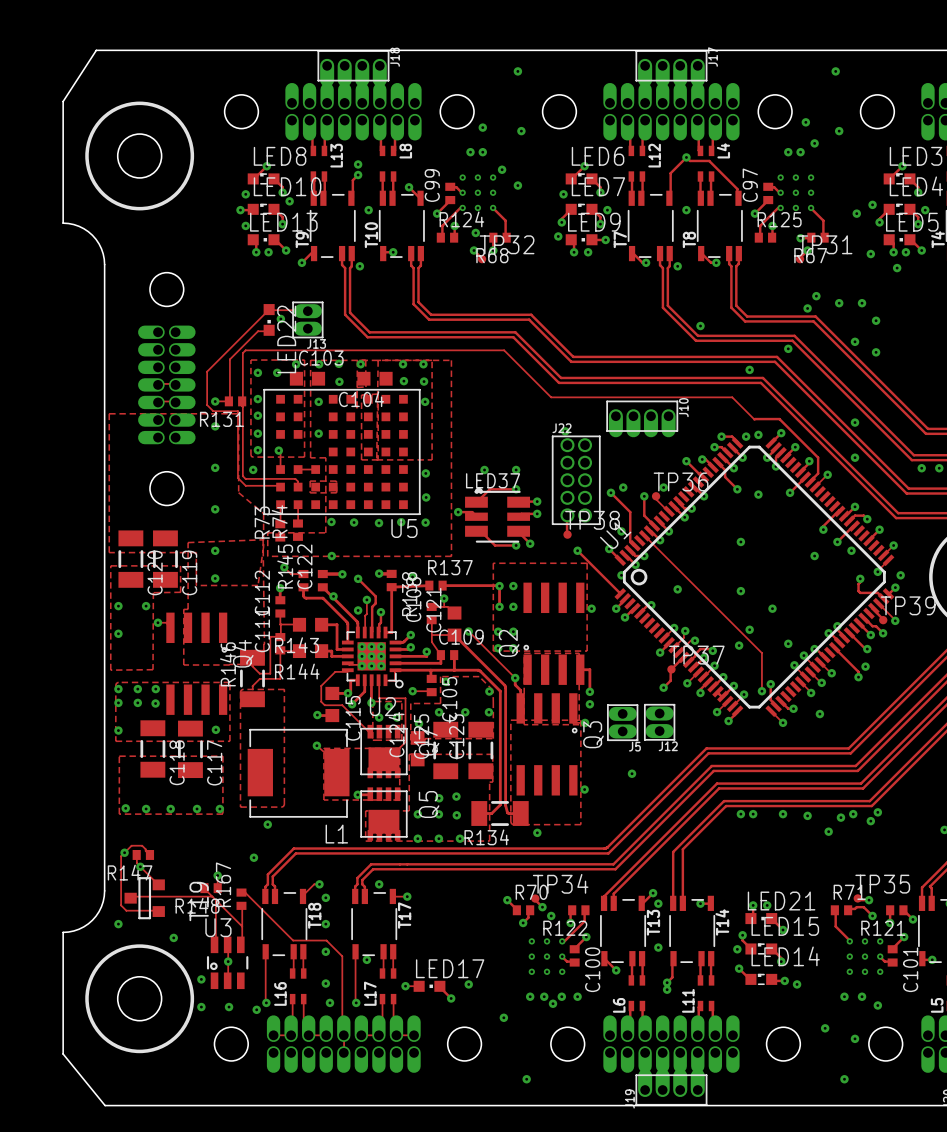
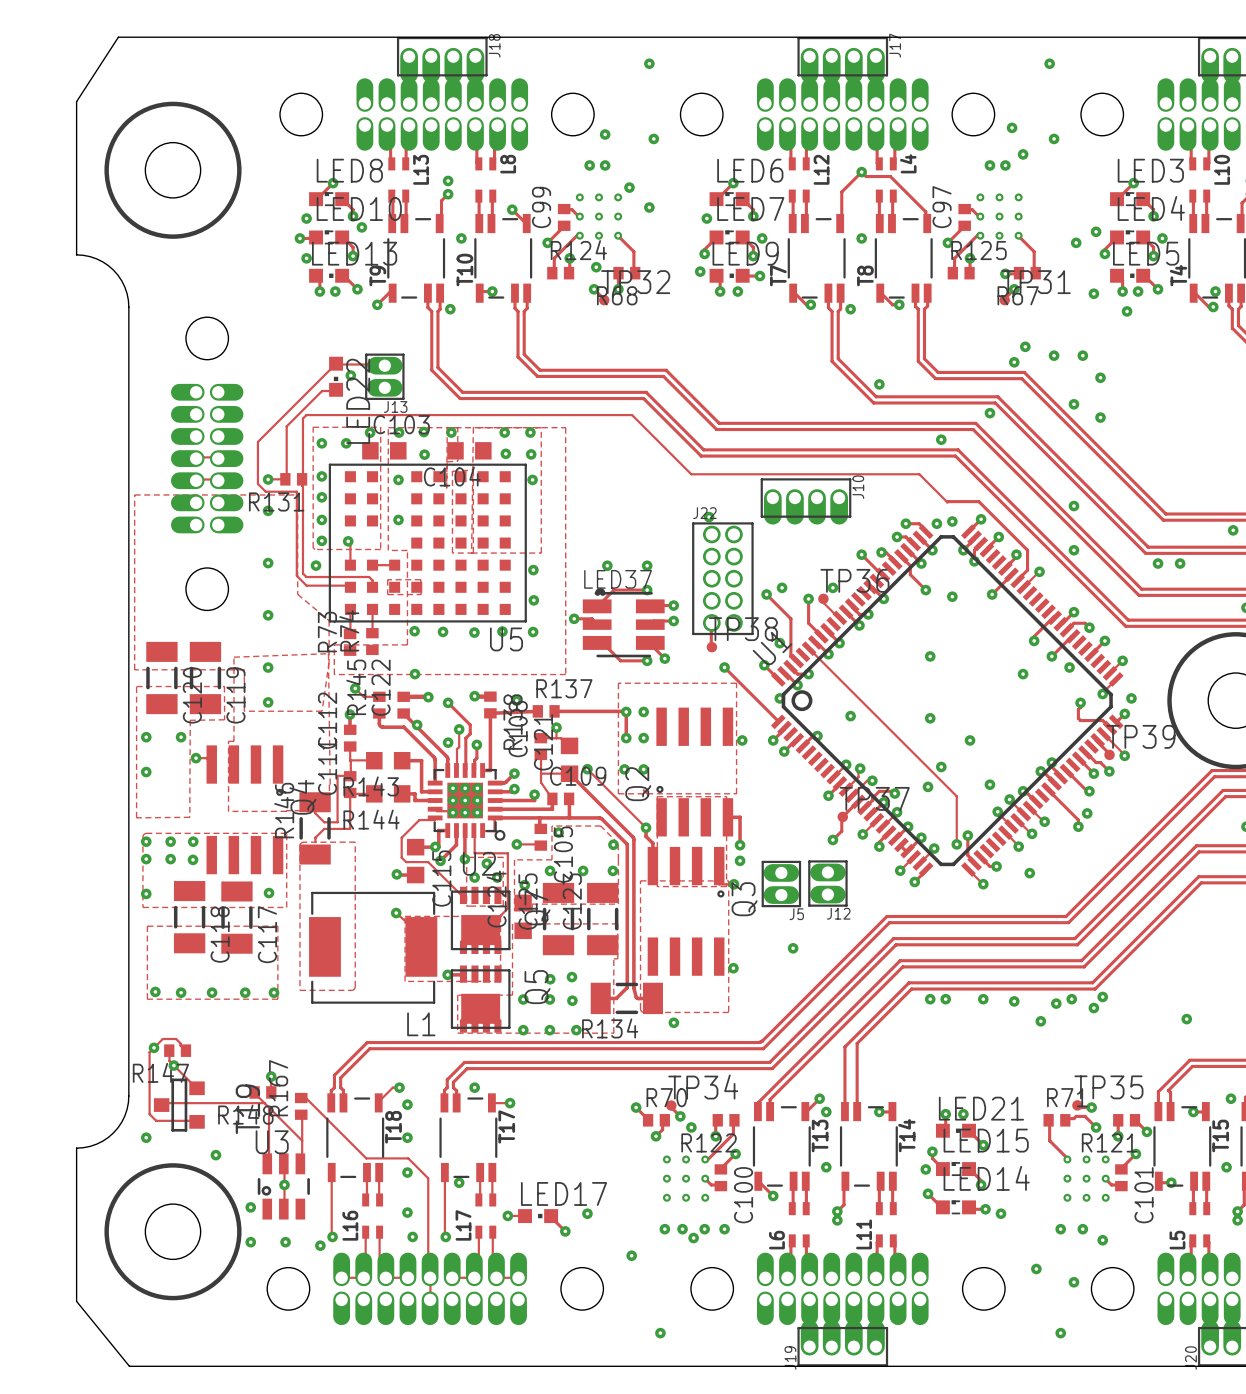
via: (498, 648) -> none
via: (513, 648) -> none
via: (267, 824) -> none
via: (253, 857) -> none

